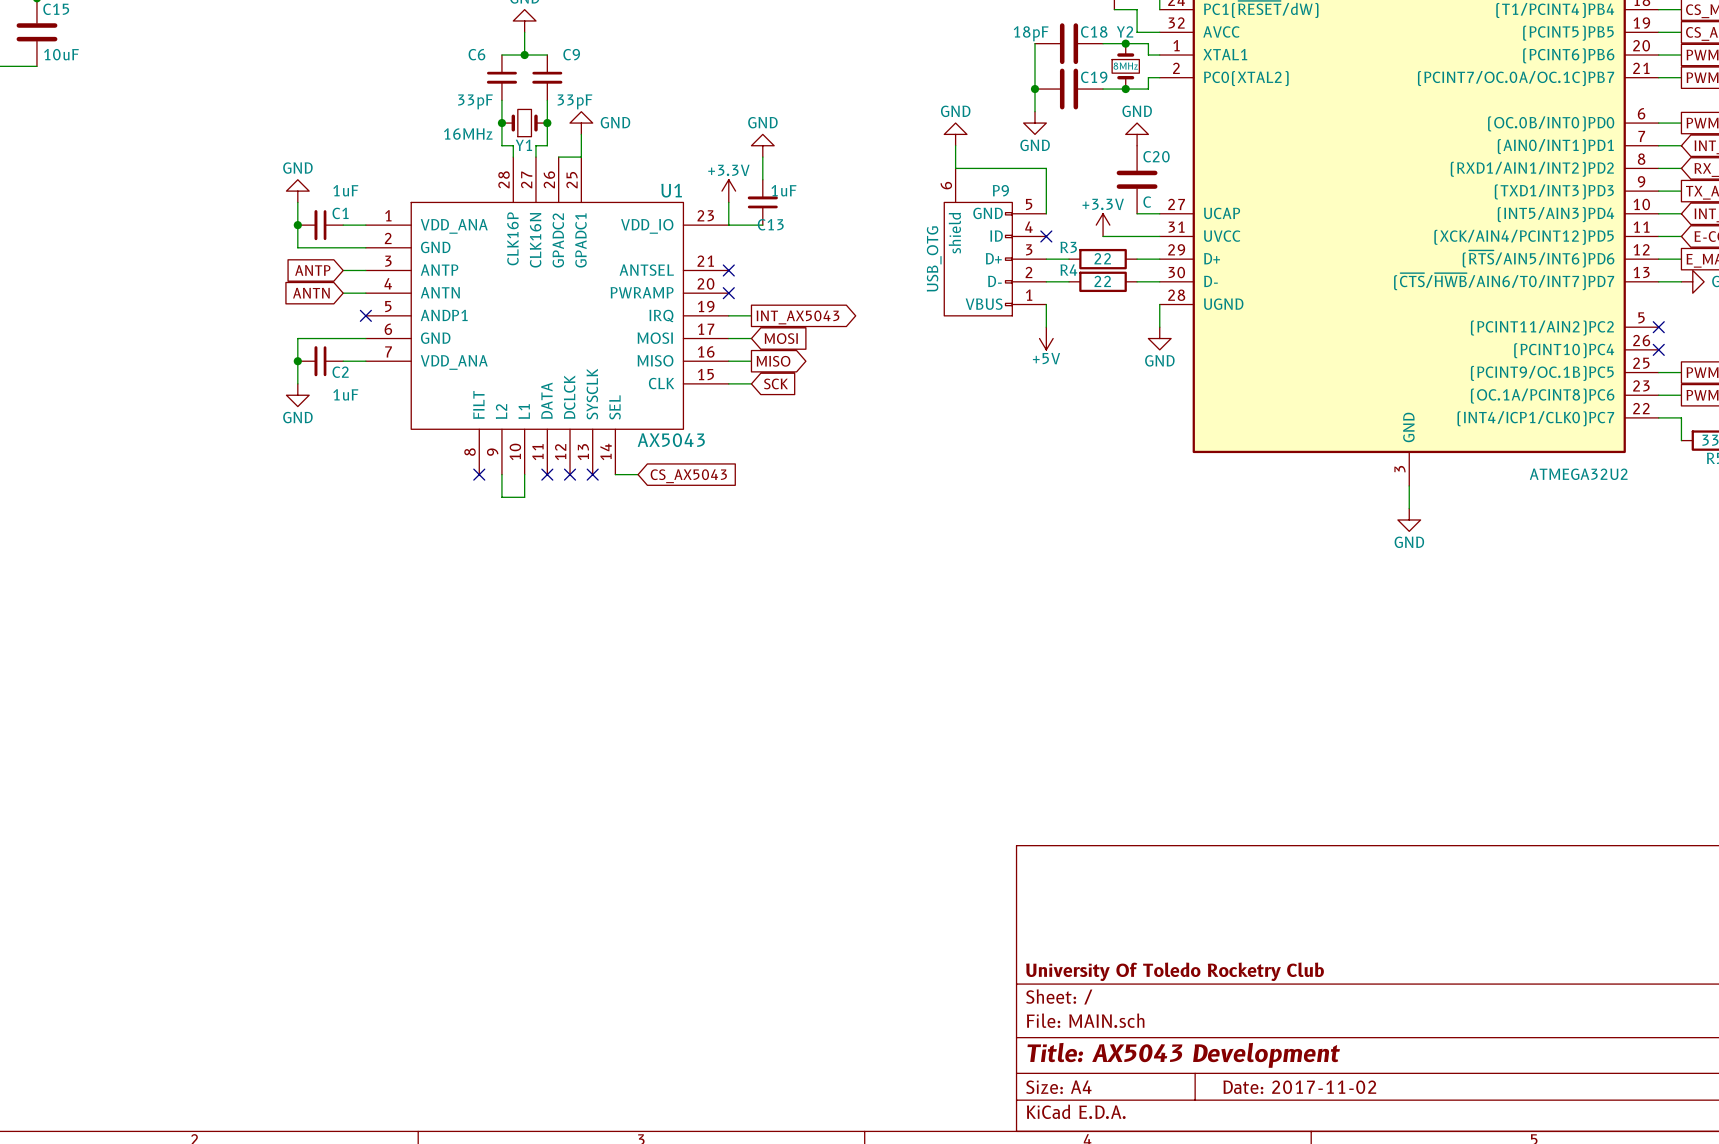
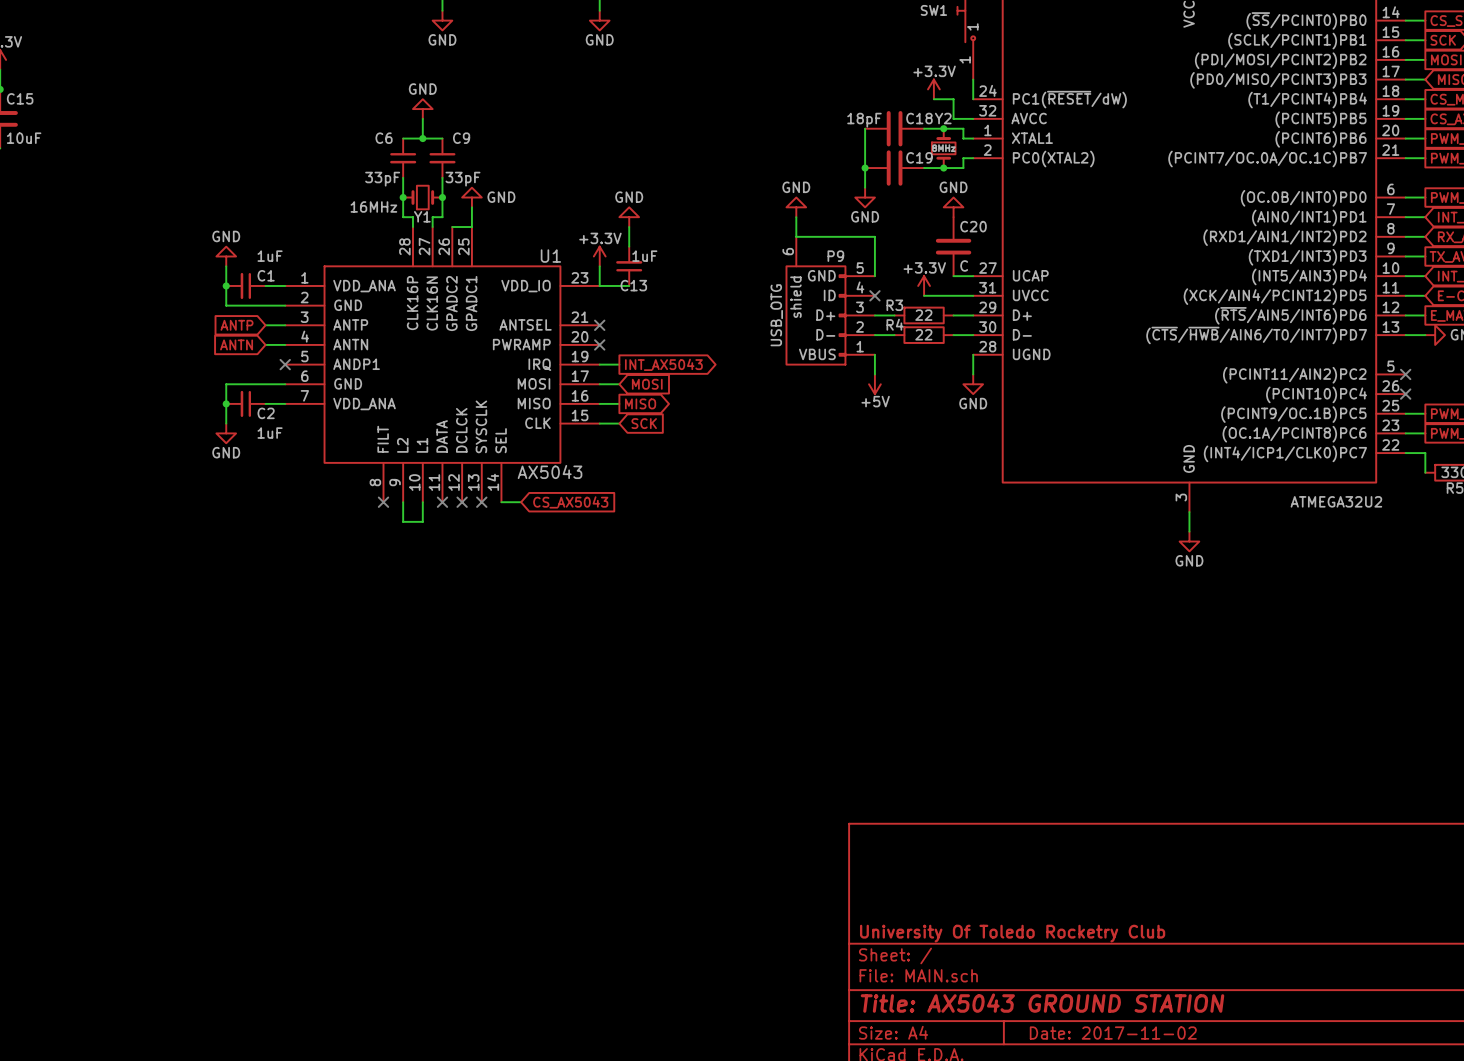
title block: Title: AX5043 Development (1183, 1055) -> Title: AX5043 GROUND STATION (1042, 1003)

